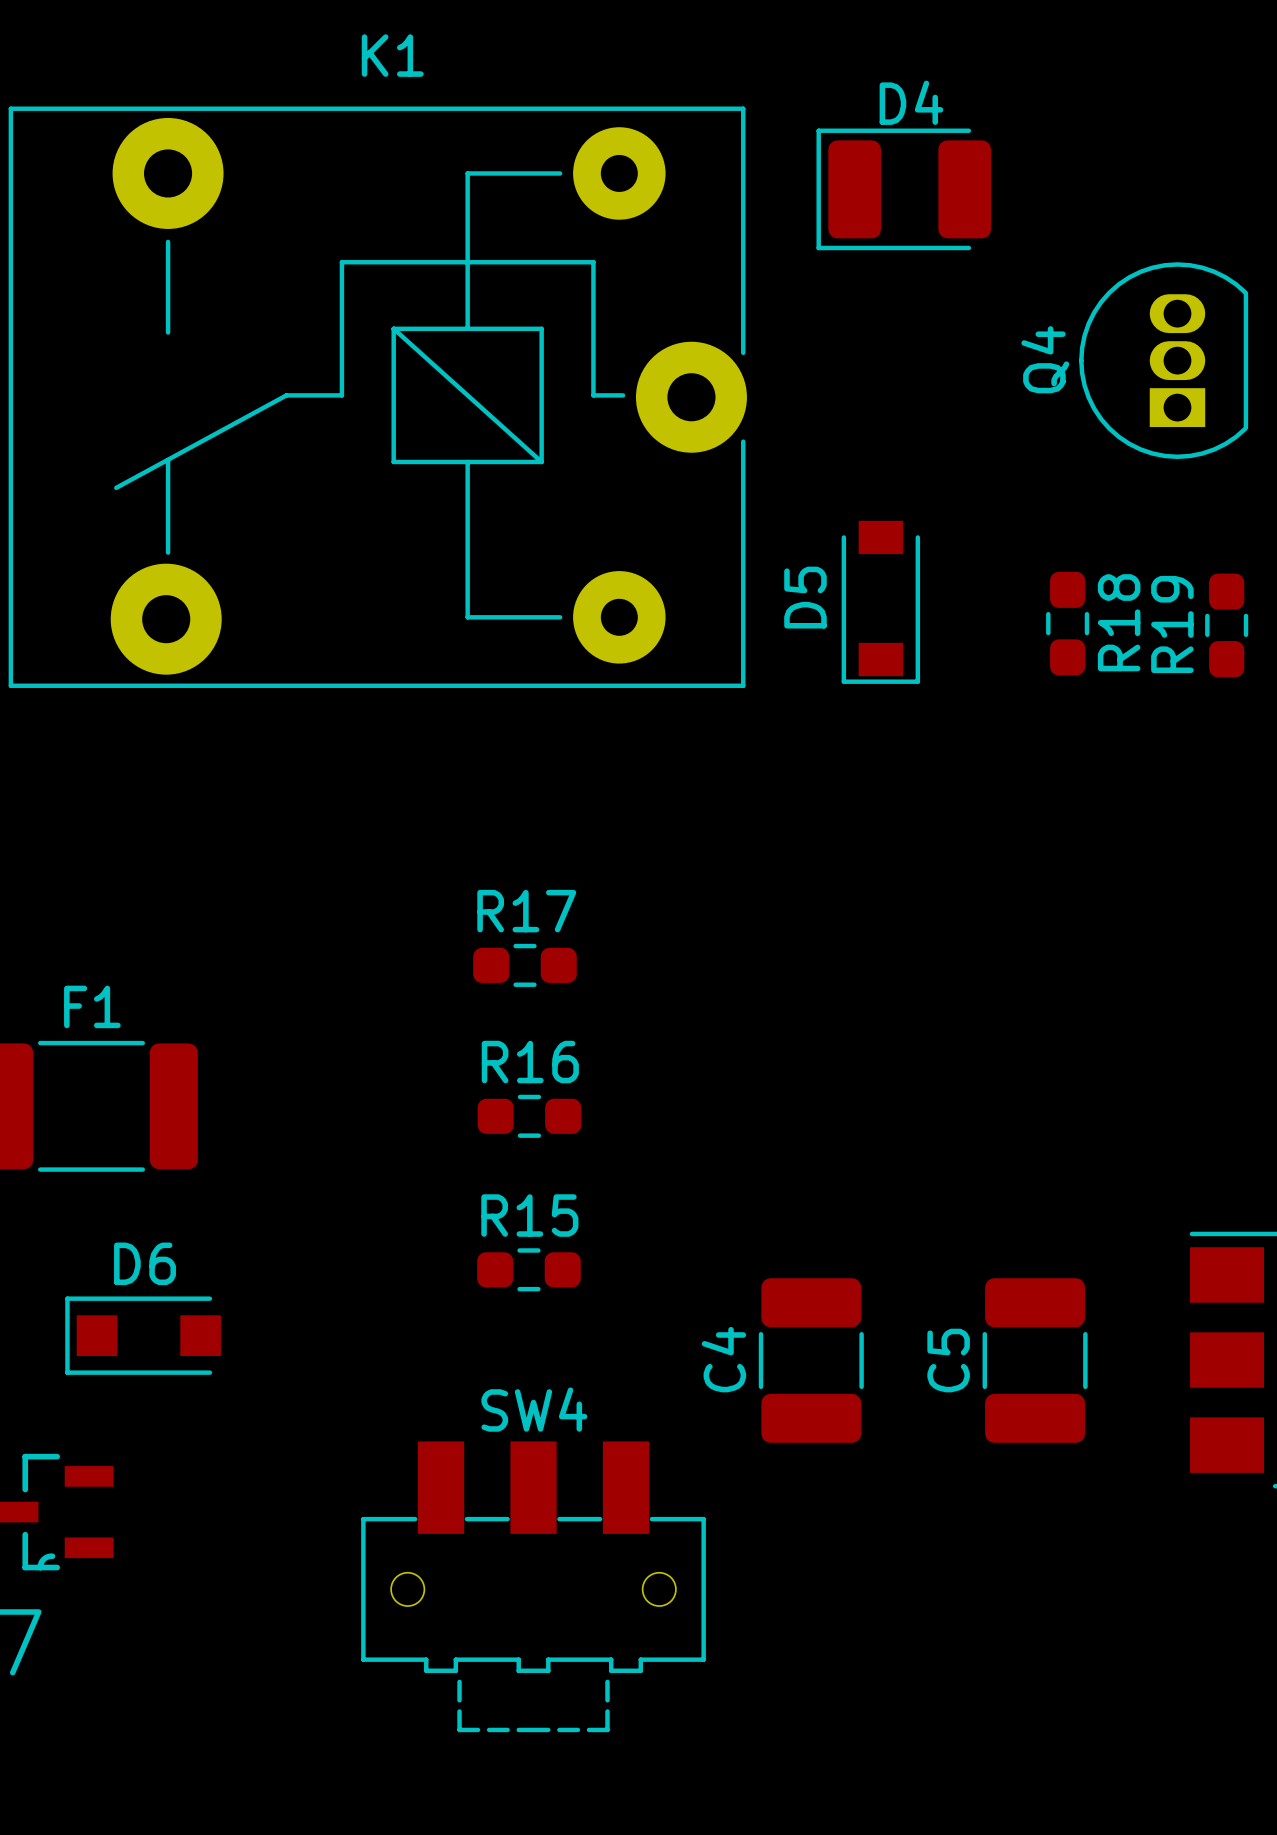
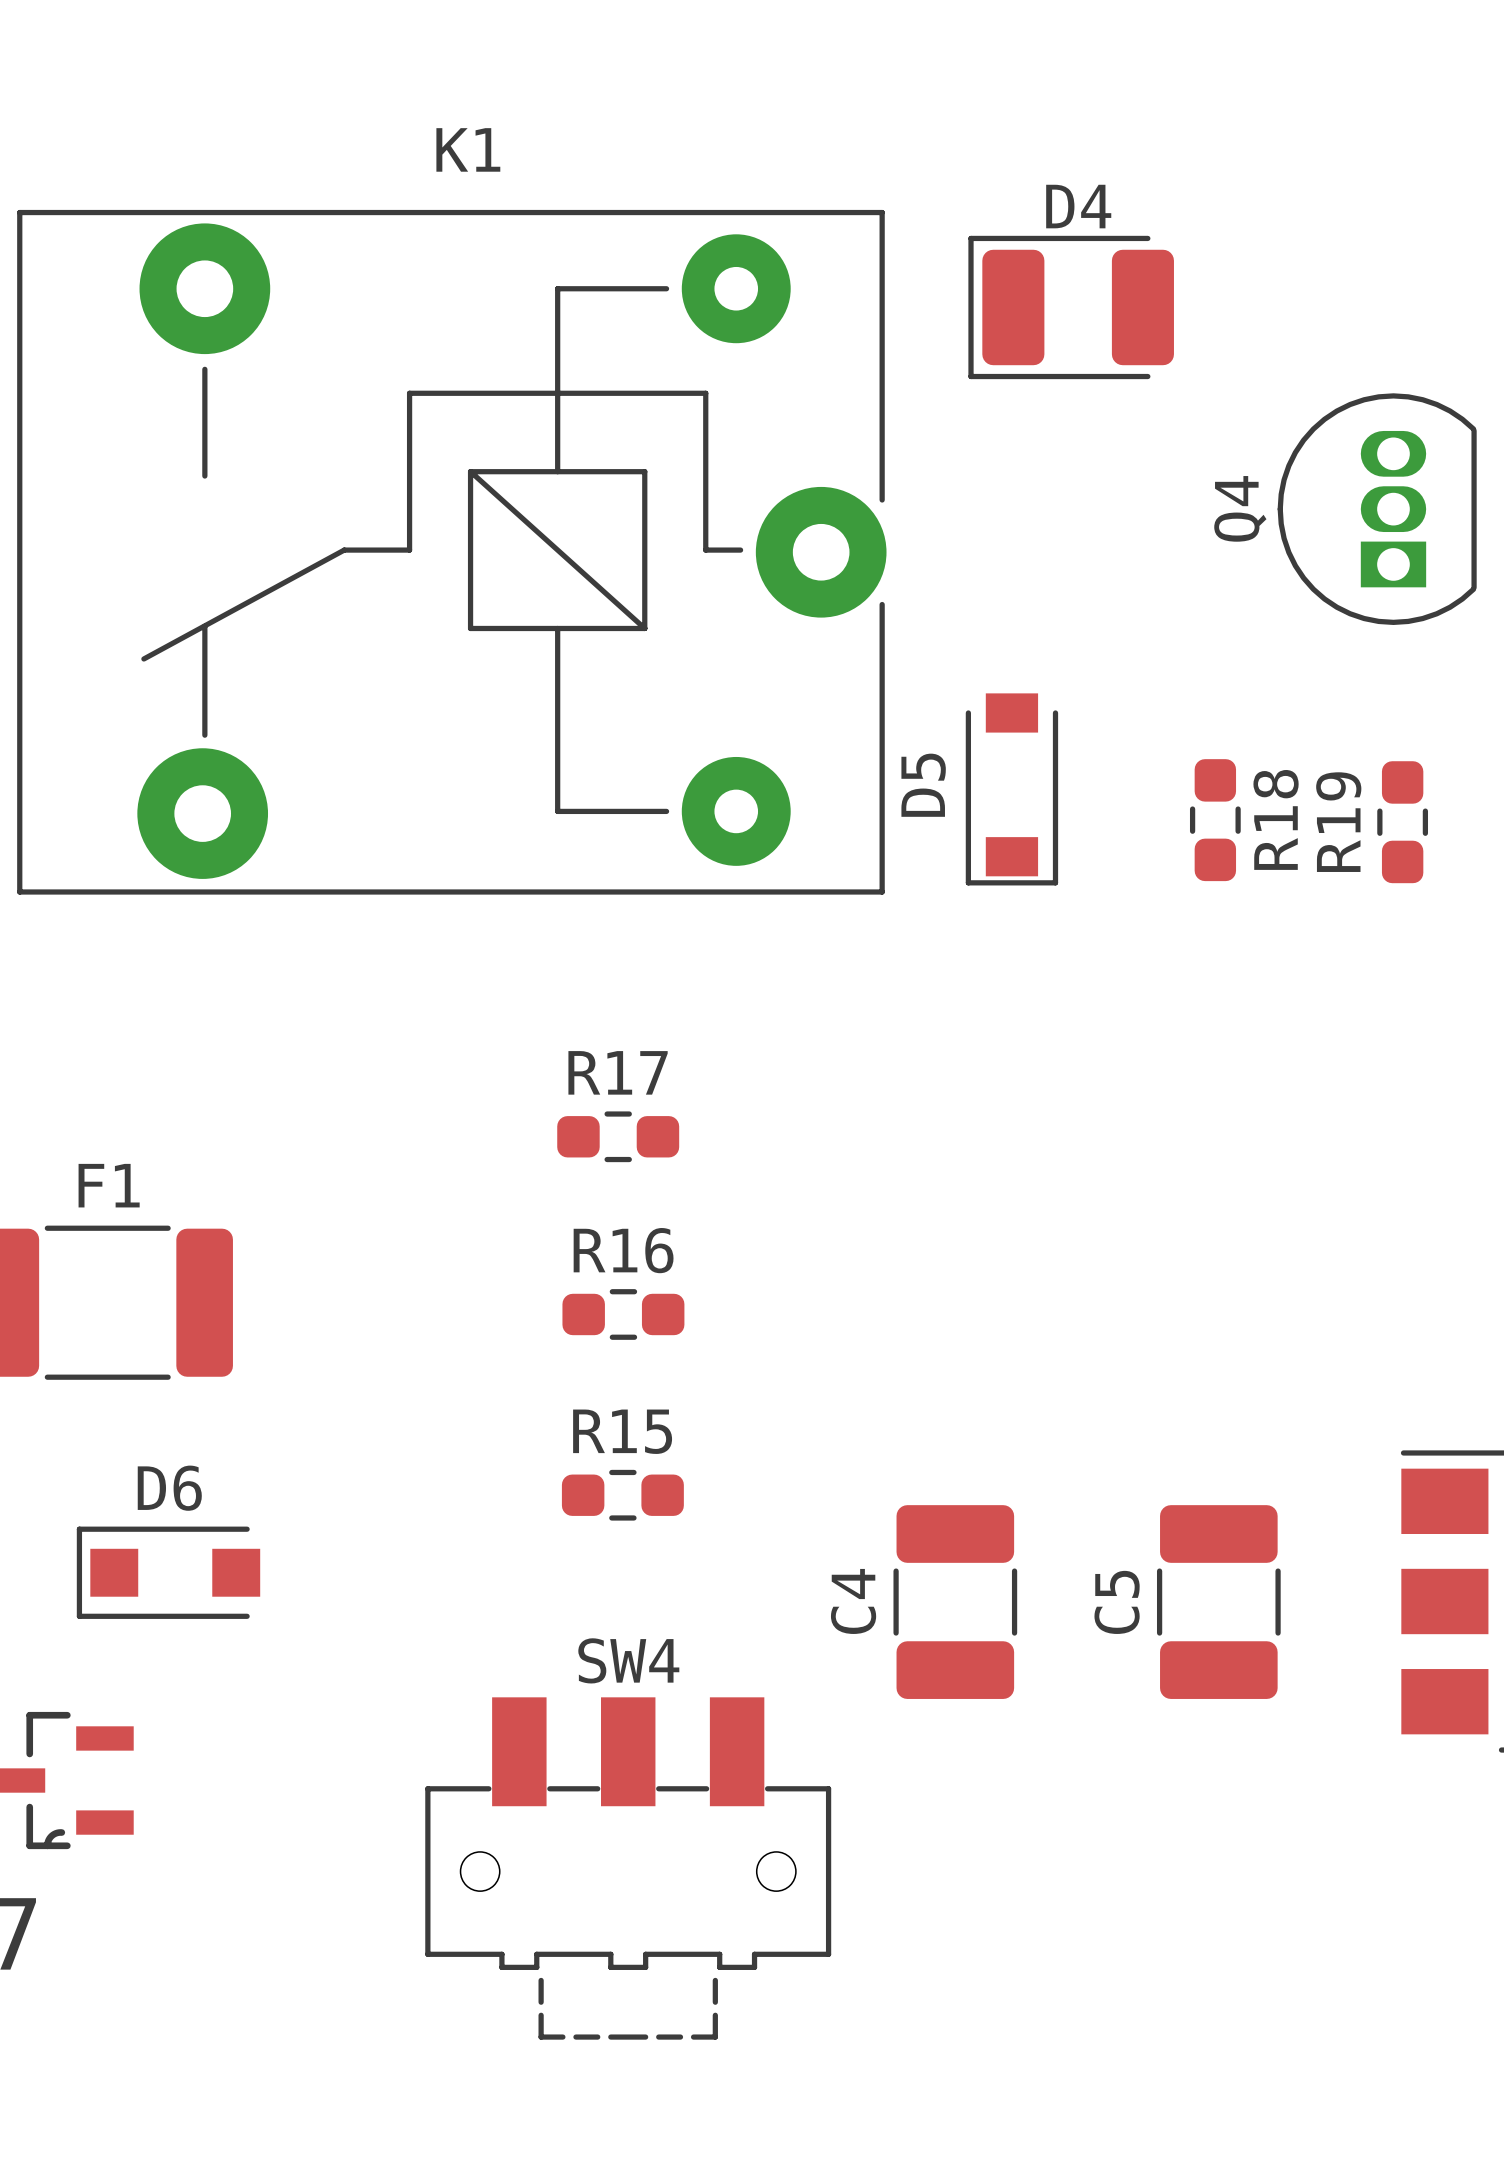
D4 position: (903, 189) -> (1071, 307)
Q4 position: (1163, 360) -> (1377, 509)
K1 position: (377, 397) -> (451, 552)
D5 position: (880, 602) -> (1011, 789)
R18 position: (1067, 623) -> (1215, 820)
R19 position: (1226, 625) -> (1402, 822)

